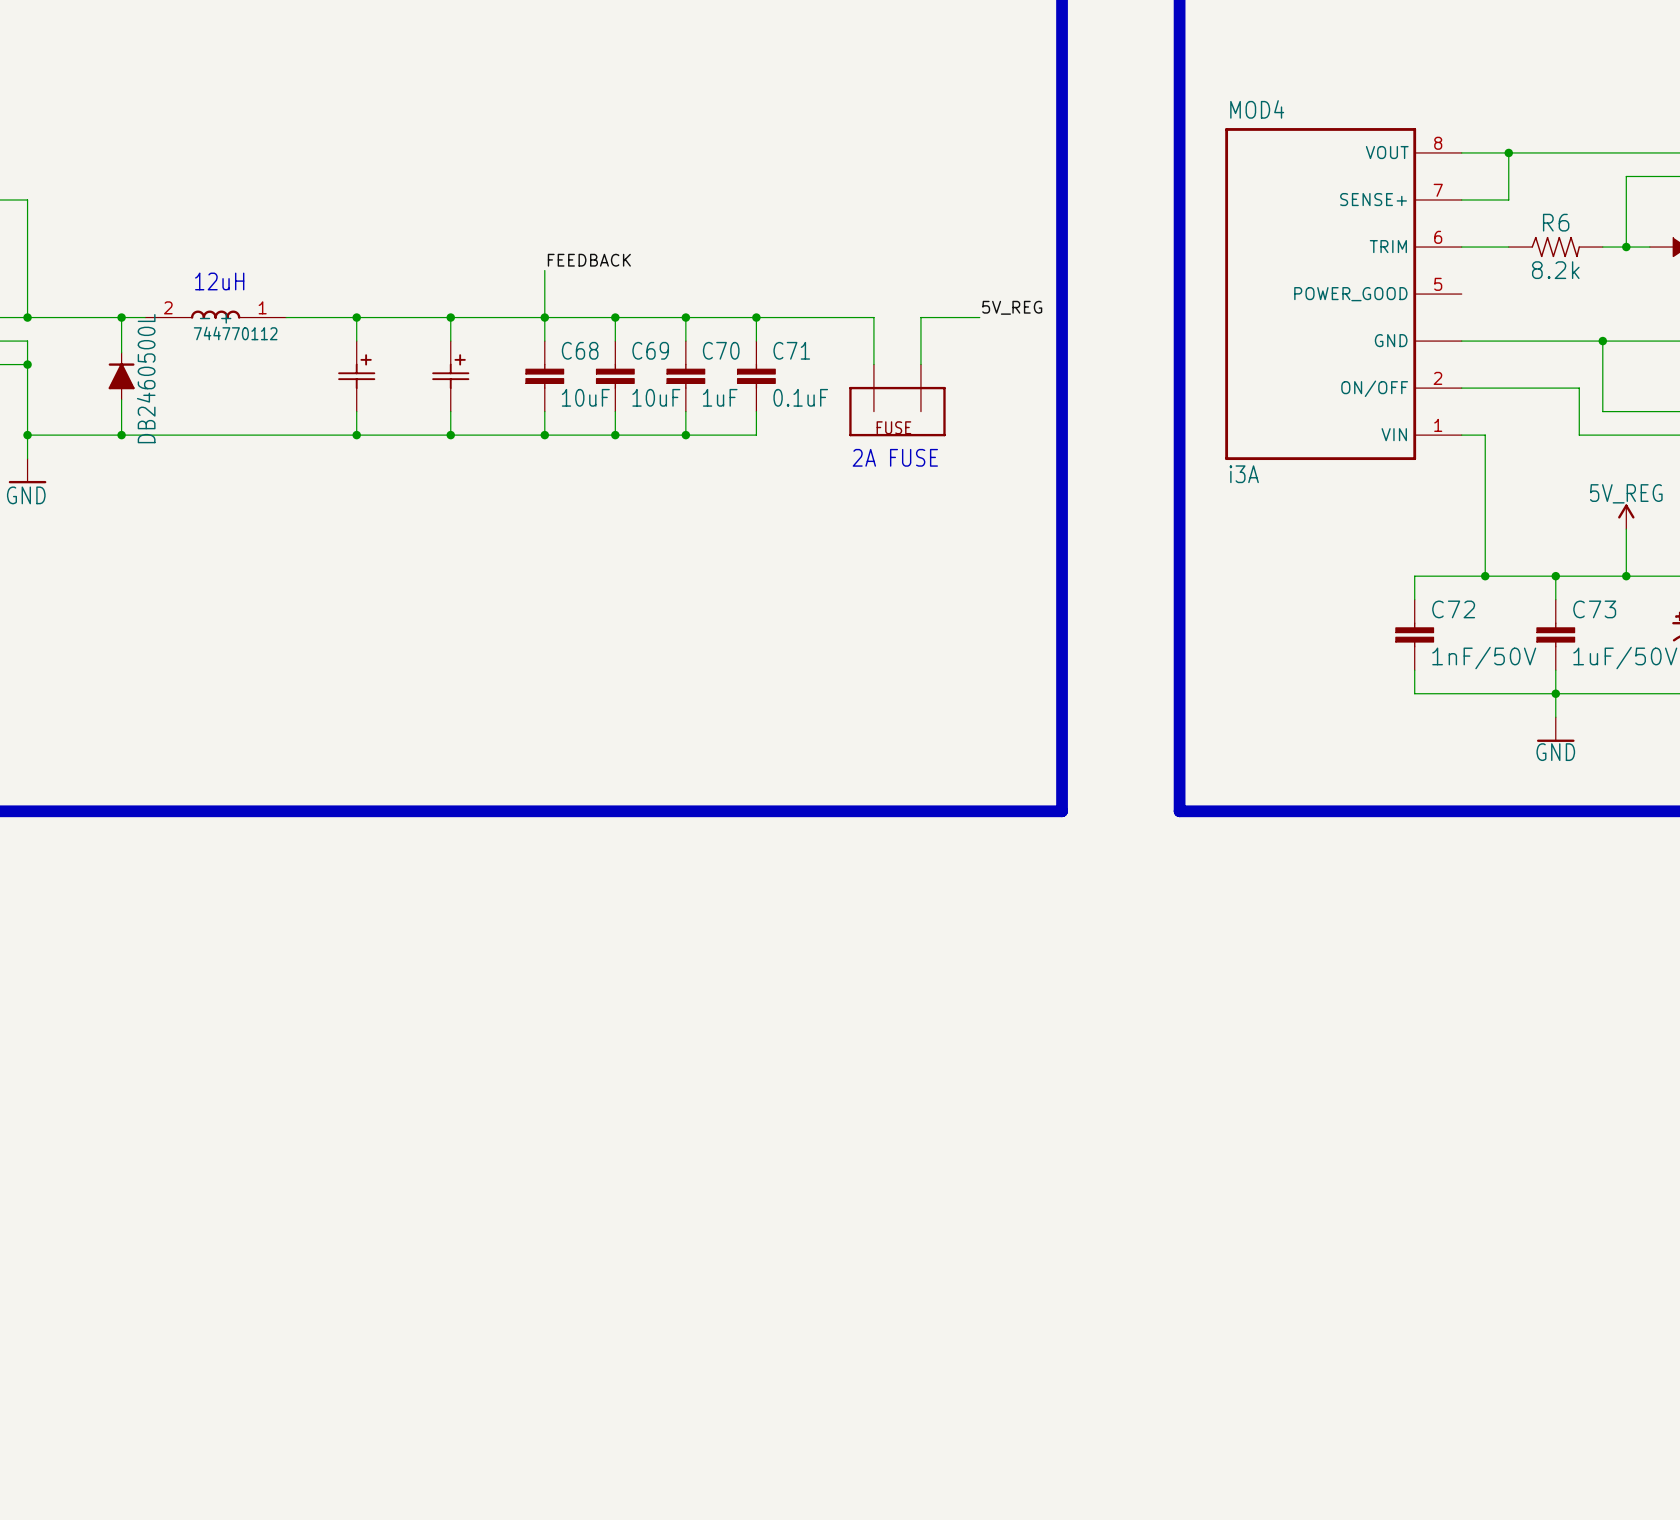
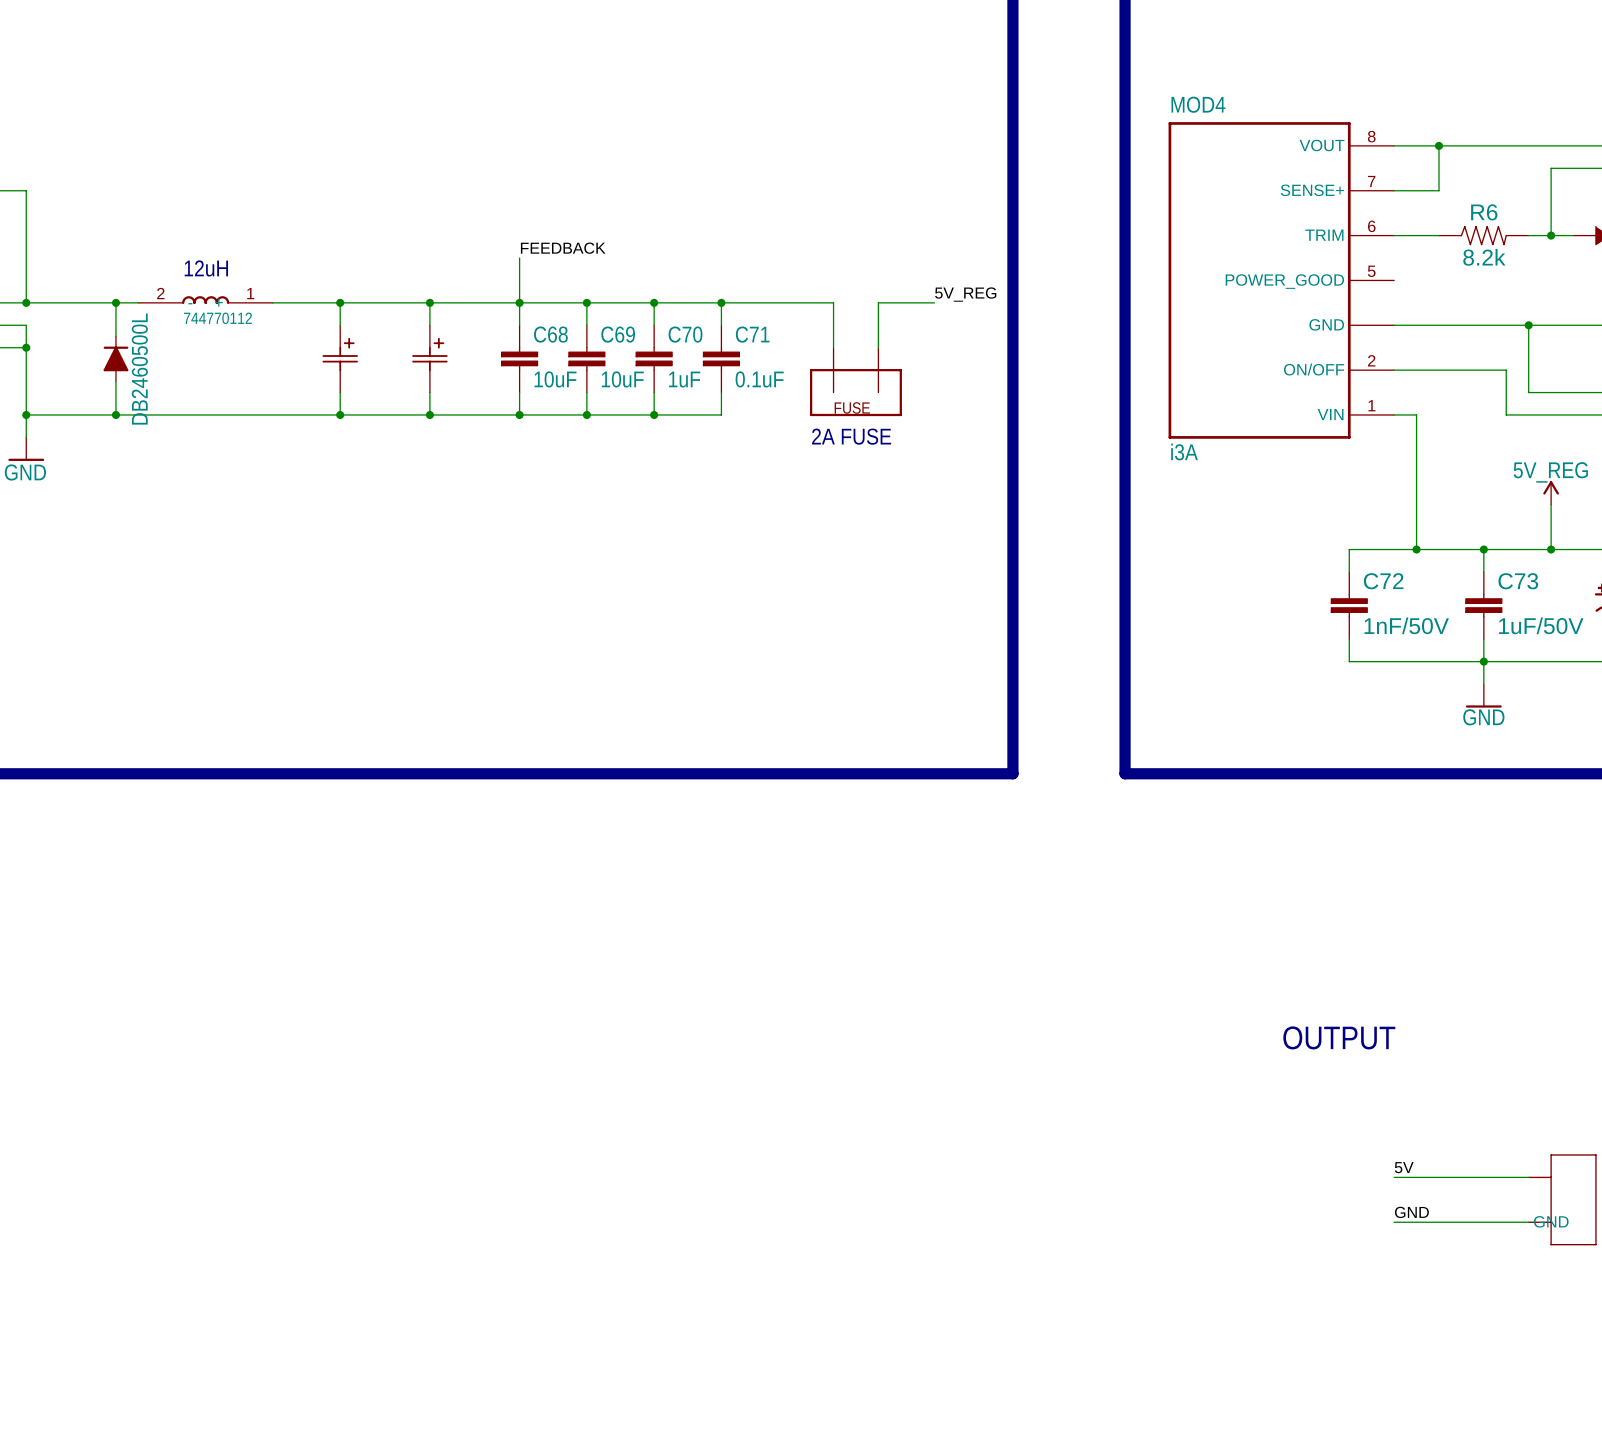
text: none -> OUTPUT (1339, 1037)
label: none -> 5V (1404, 1167)
wire: none -> (1394, 1177) (1528, 1177)
part: none -> (1562, 1199)
label: none -> GND (1411, 1212)
wire: none -> (1394, 1222) (1528, 1222)

